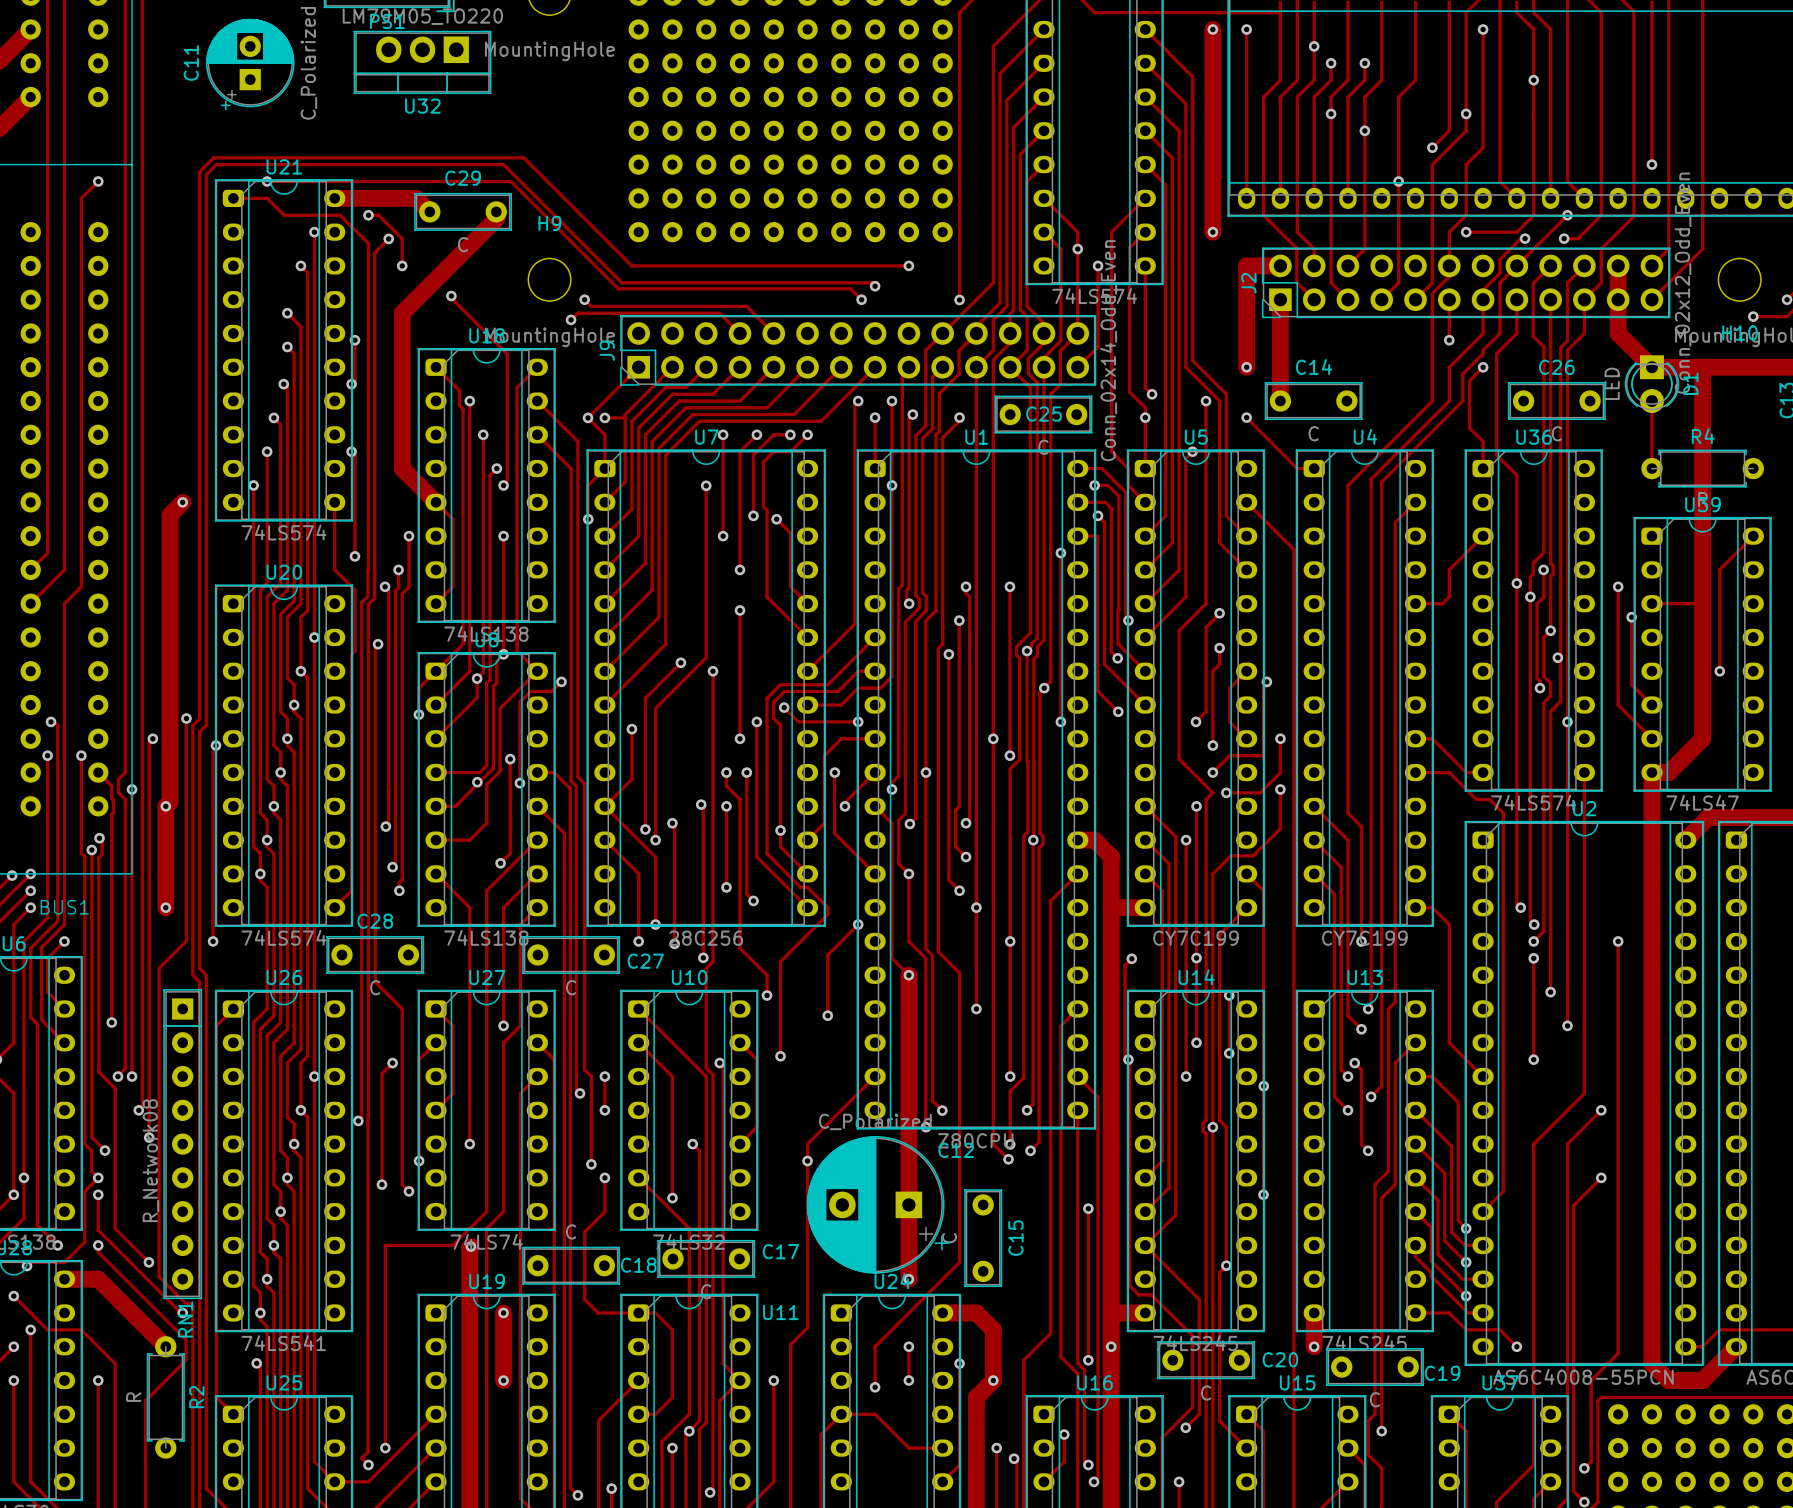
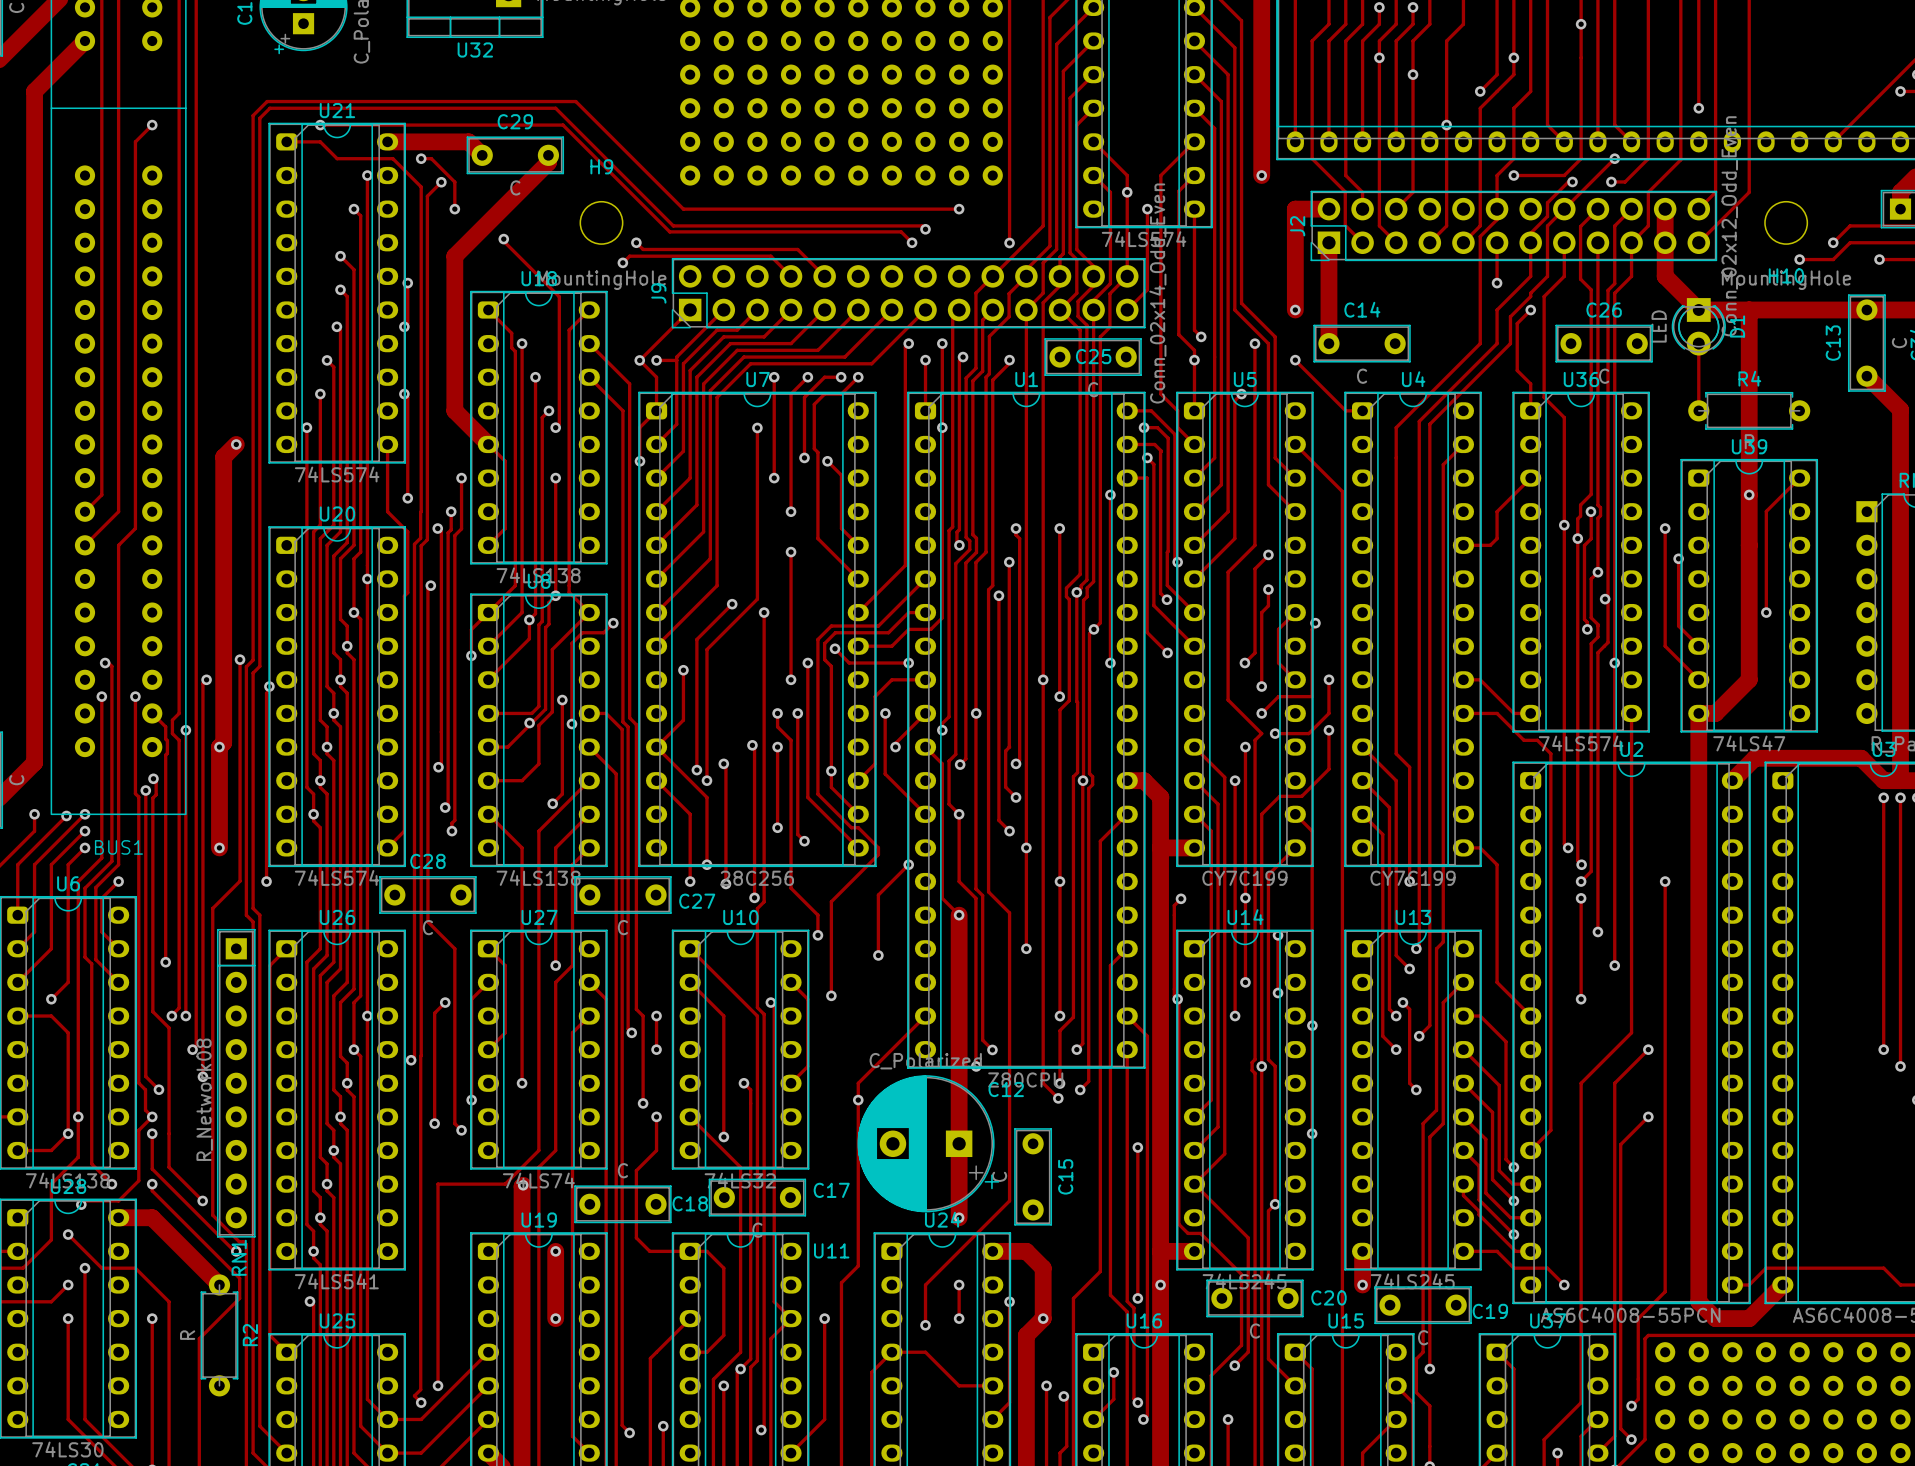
via: none -> (1749, 494)
track: (1651, 603) (1702, 603) -> none

